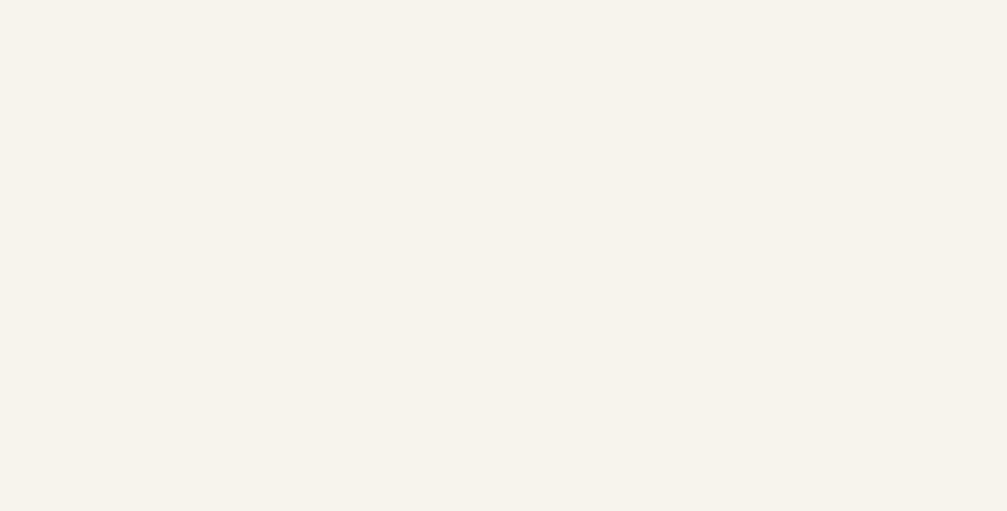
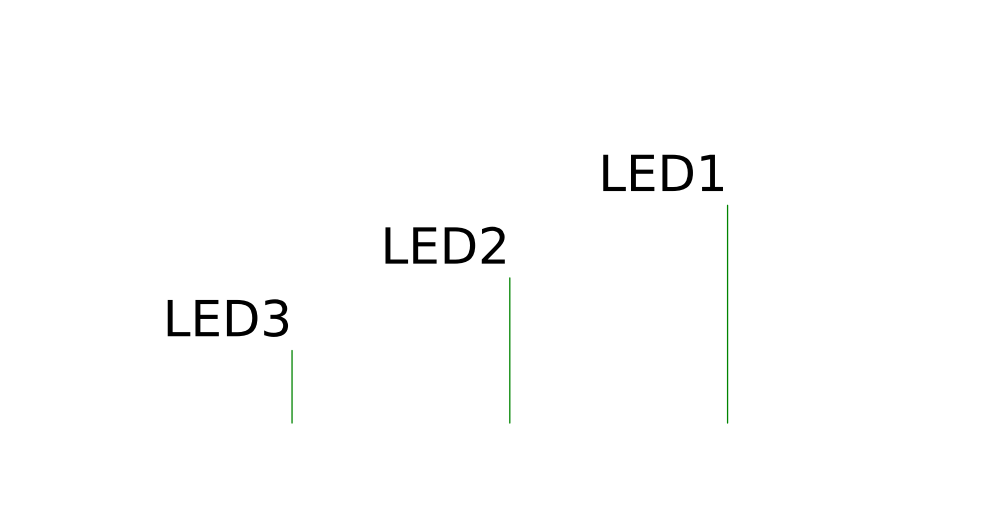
label: none -> LED1 (663, 172)
wire: none -> (727, 205) (727, 423)
label: none -> LED2 (445, 245)
wire: none -> (509, 277) (509, 423)
label: none -> LED3 (227, 318)
wire: none -> (292, 350) (292, 423)

